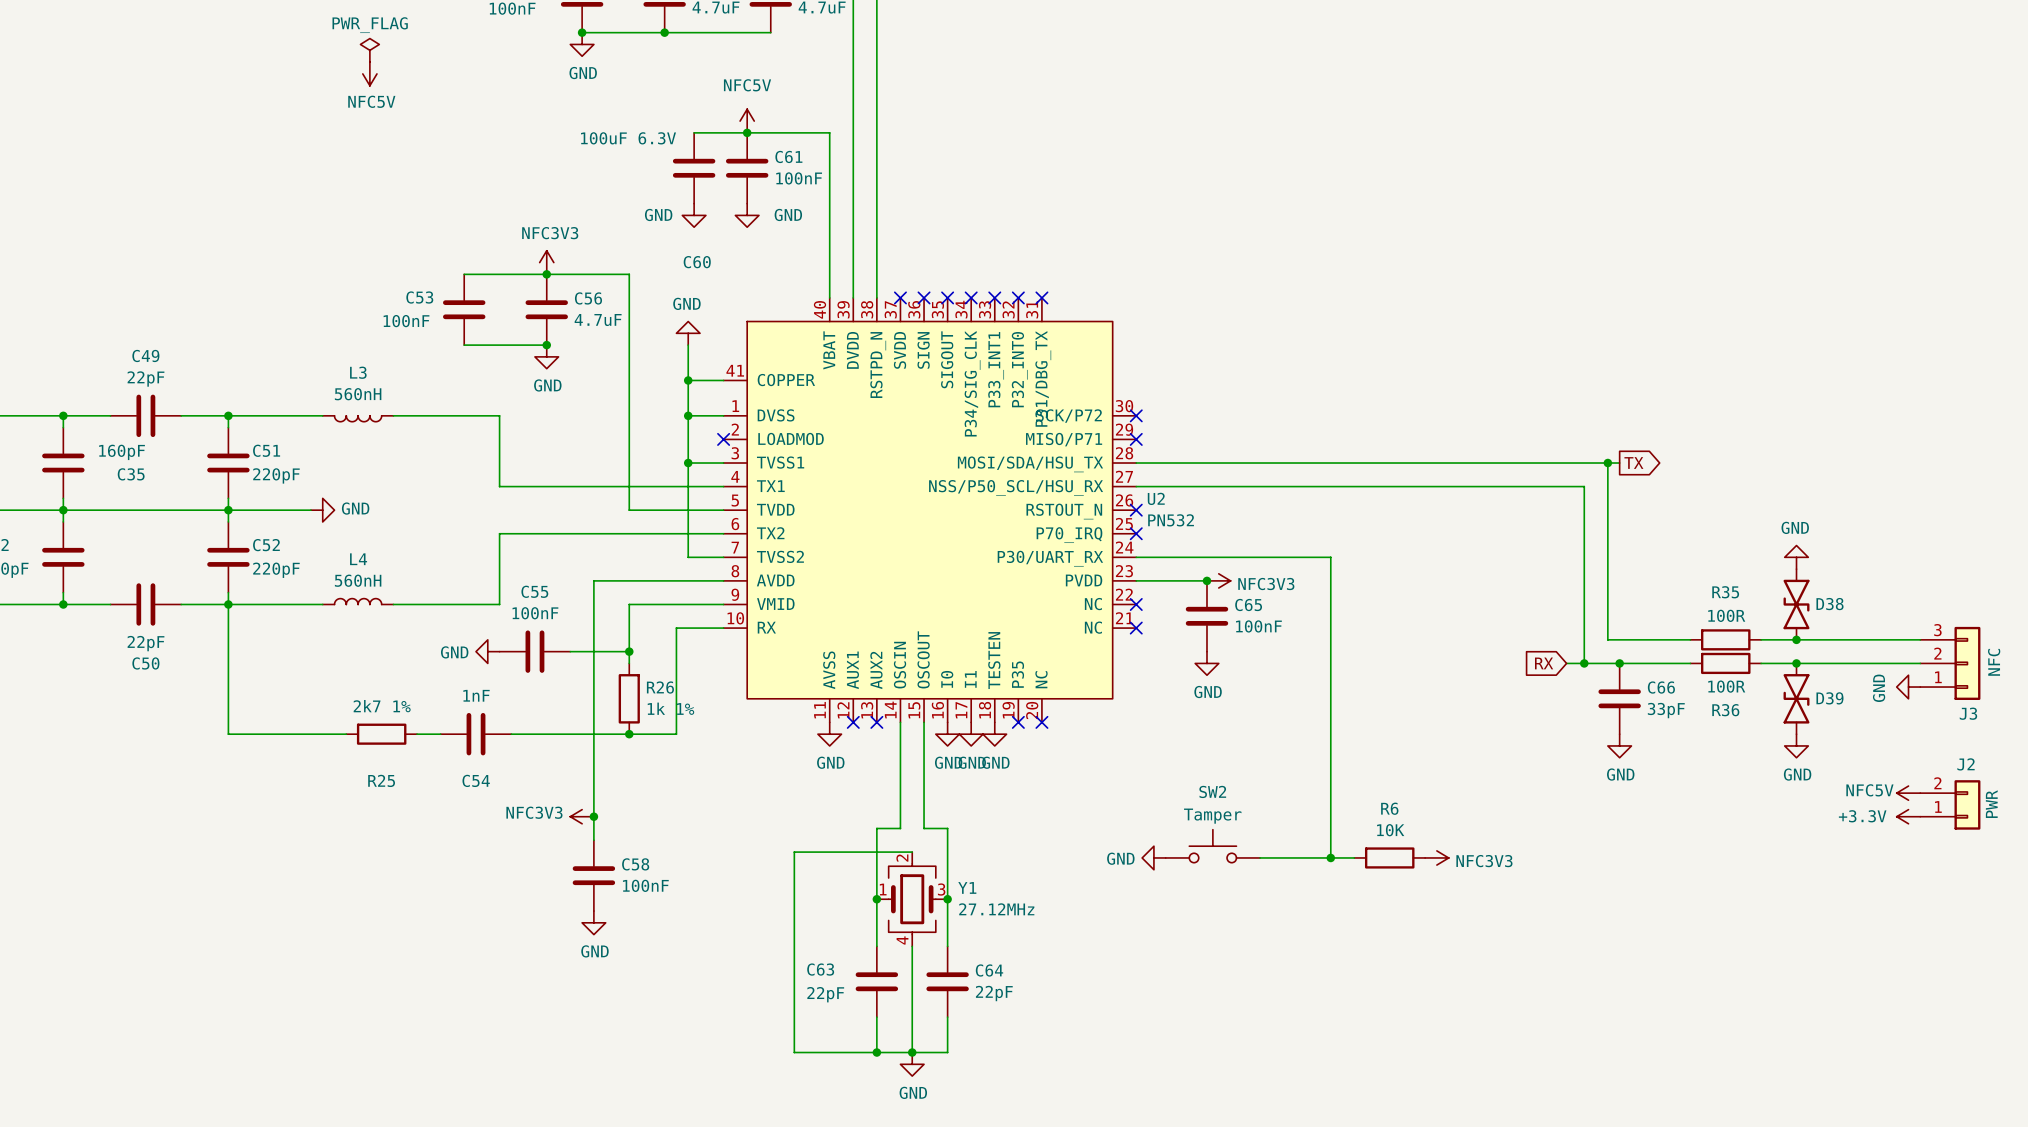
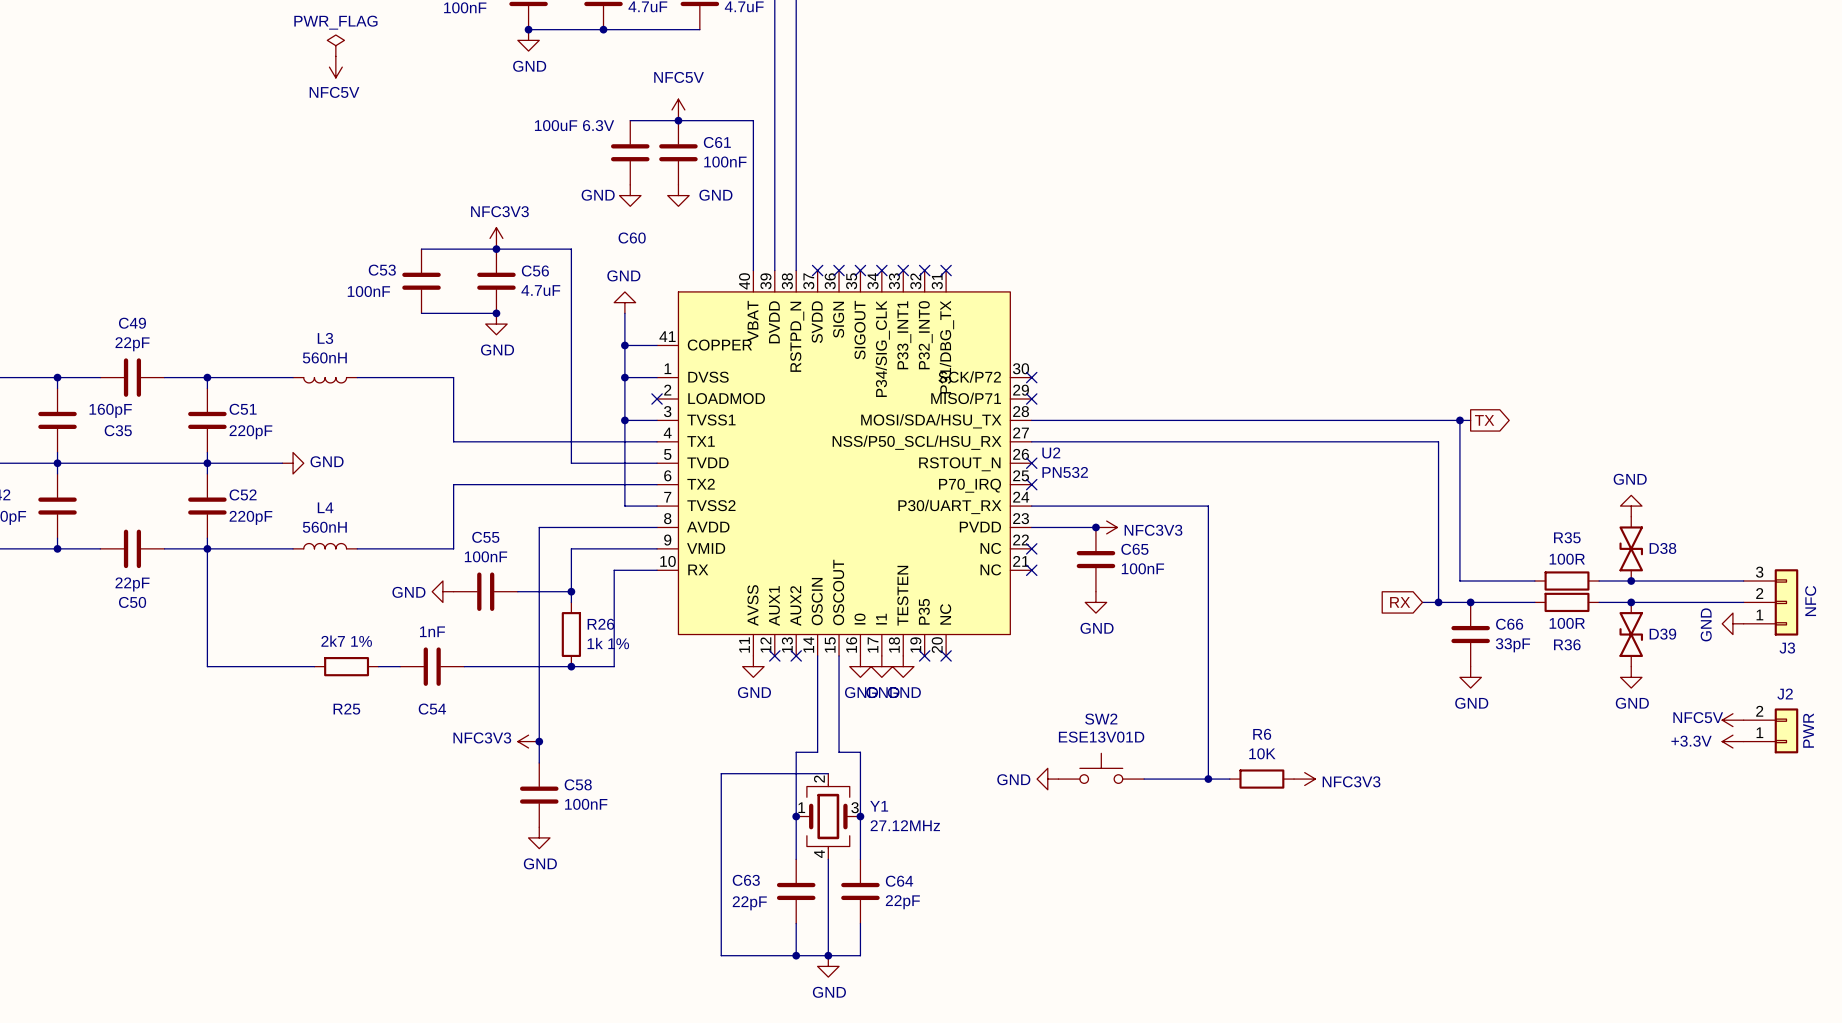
SW2 value: Tamper (1212, 816) -> ESE13V01D (1101, 737)

